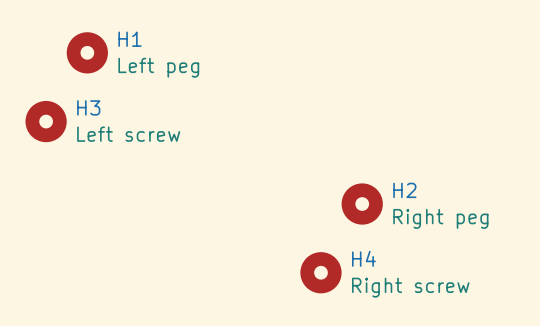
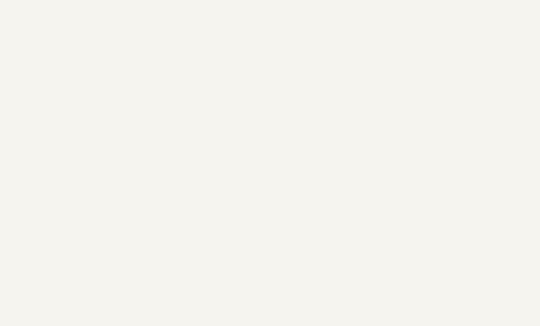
H1: Left peg (87, 52) -> none
H3: Left screw (46, 121) -> none
H2: Right peg (362, 204) -> none
H4: Right screw (320, 272) -> none

